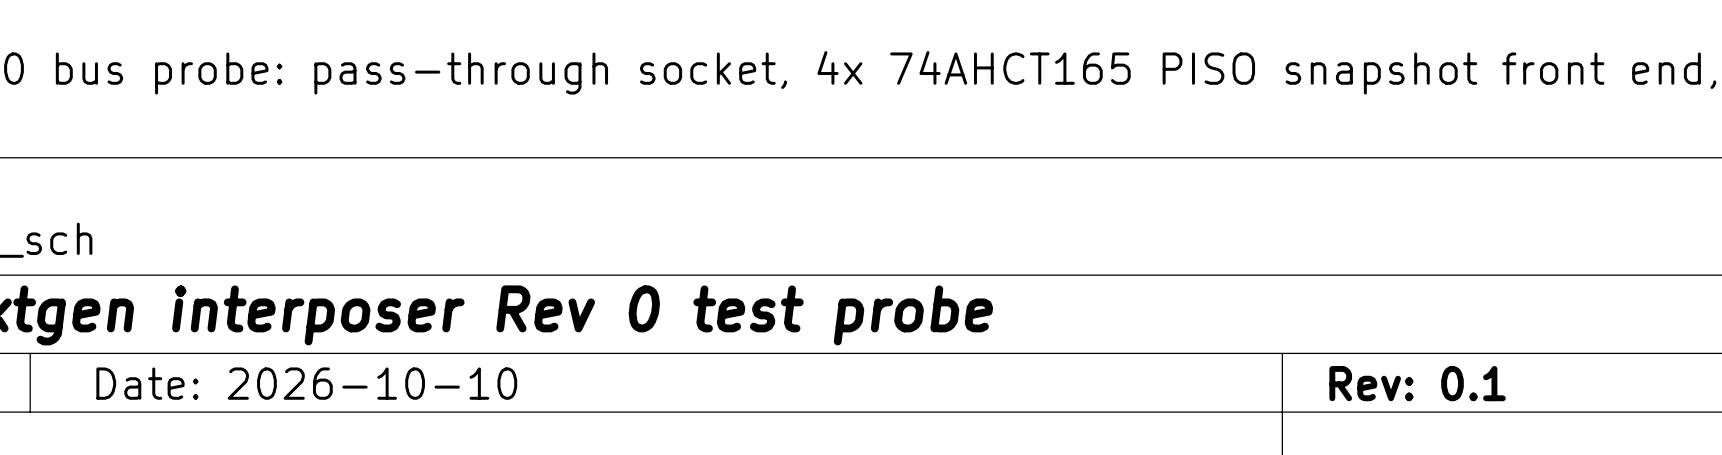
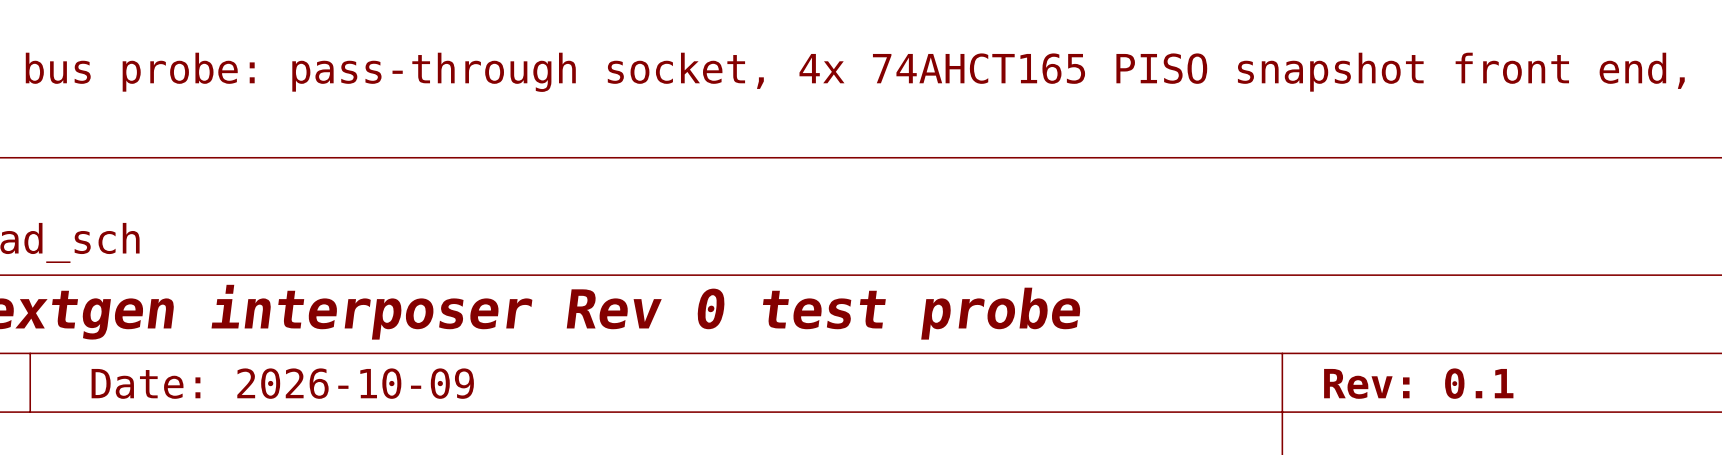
title block: Date: 2026-10-10 (306, 383) -> Date: 2026-10-09 (282, 383)

